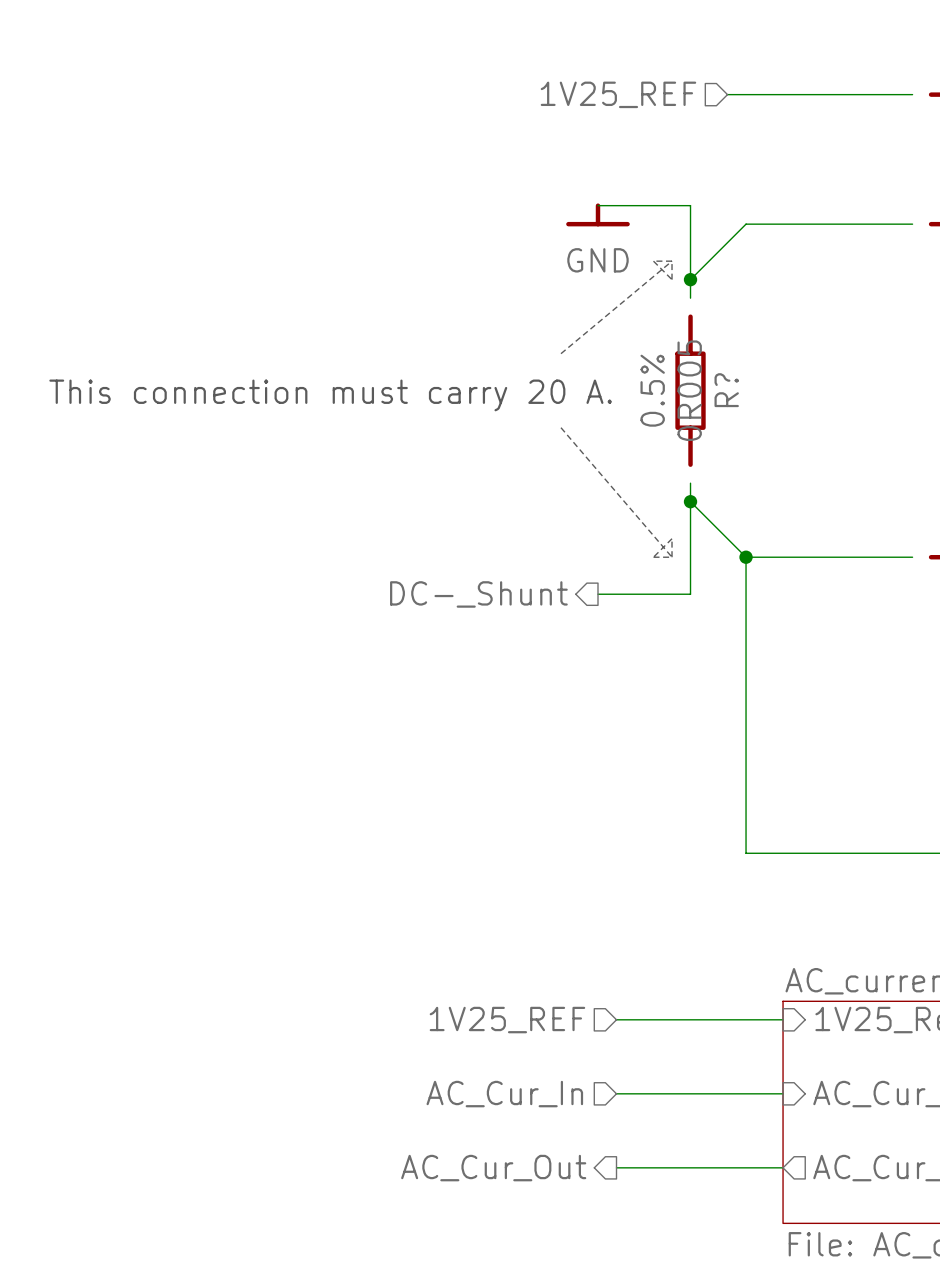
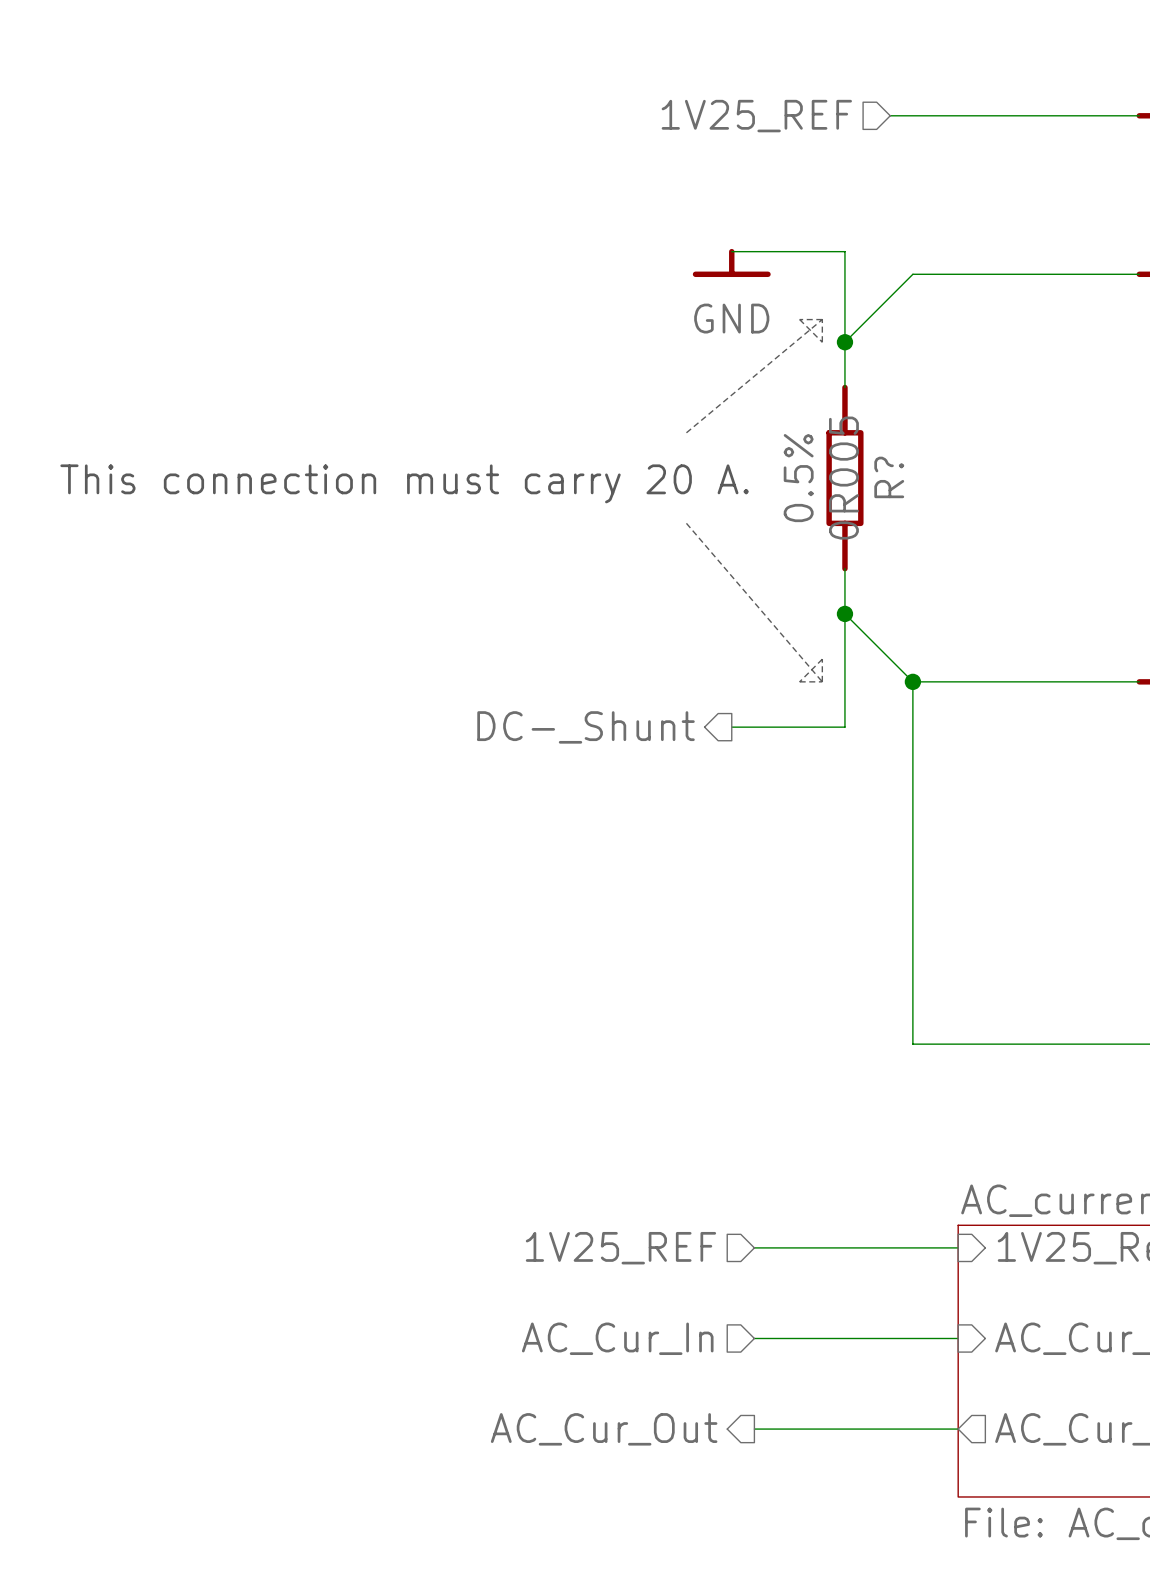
wire: none -> (1116, 115) (1139, 115)
wire: none -> (1116, 274) (1139, 274)
wire: none -> (844, 364) (844, 387)
wire: none -> (844, 568) (844, 591)
wire: none -> (1116, 681) (1139, 681)

